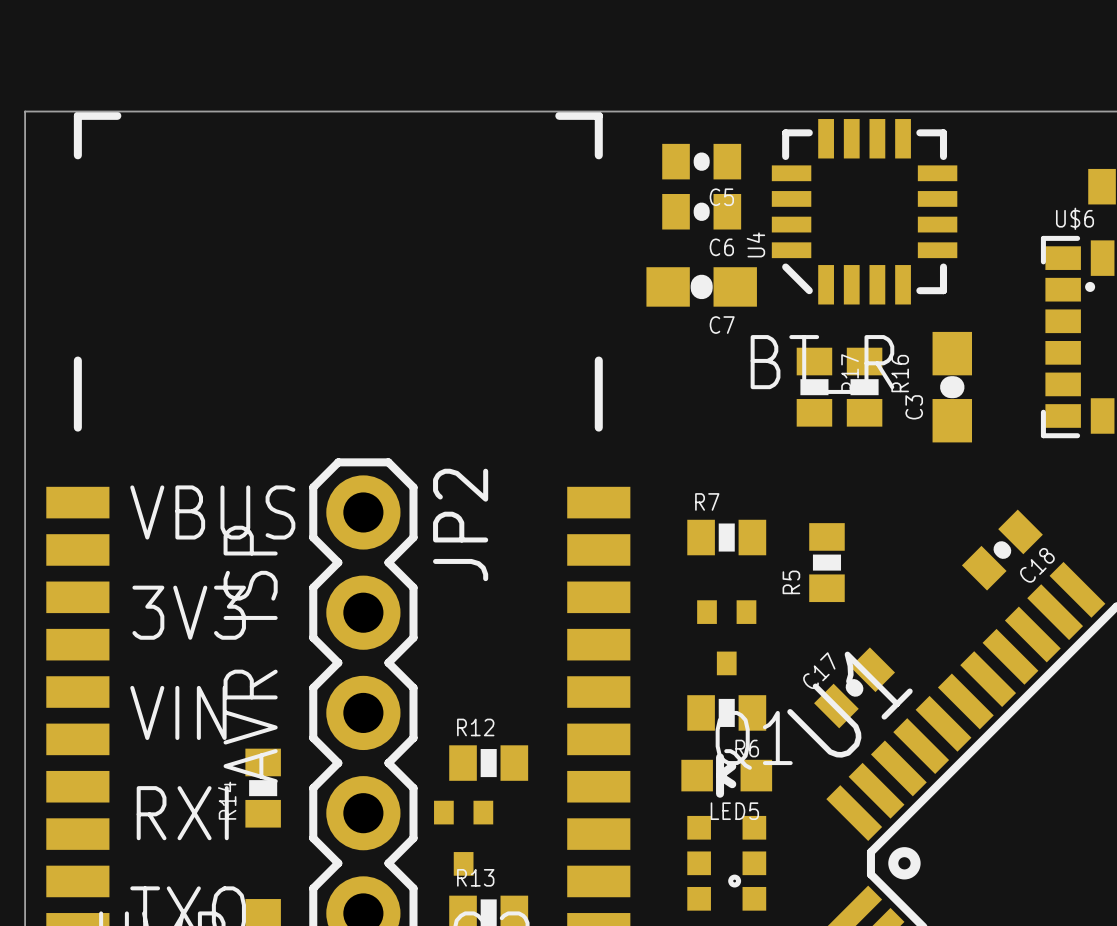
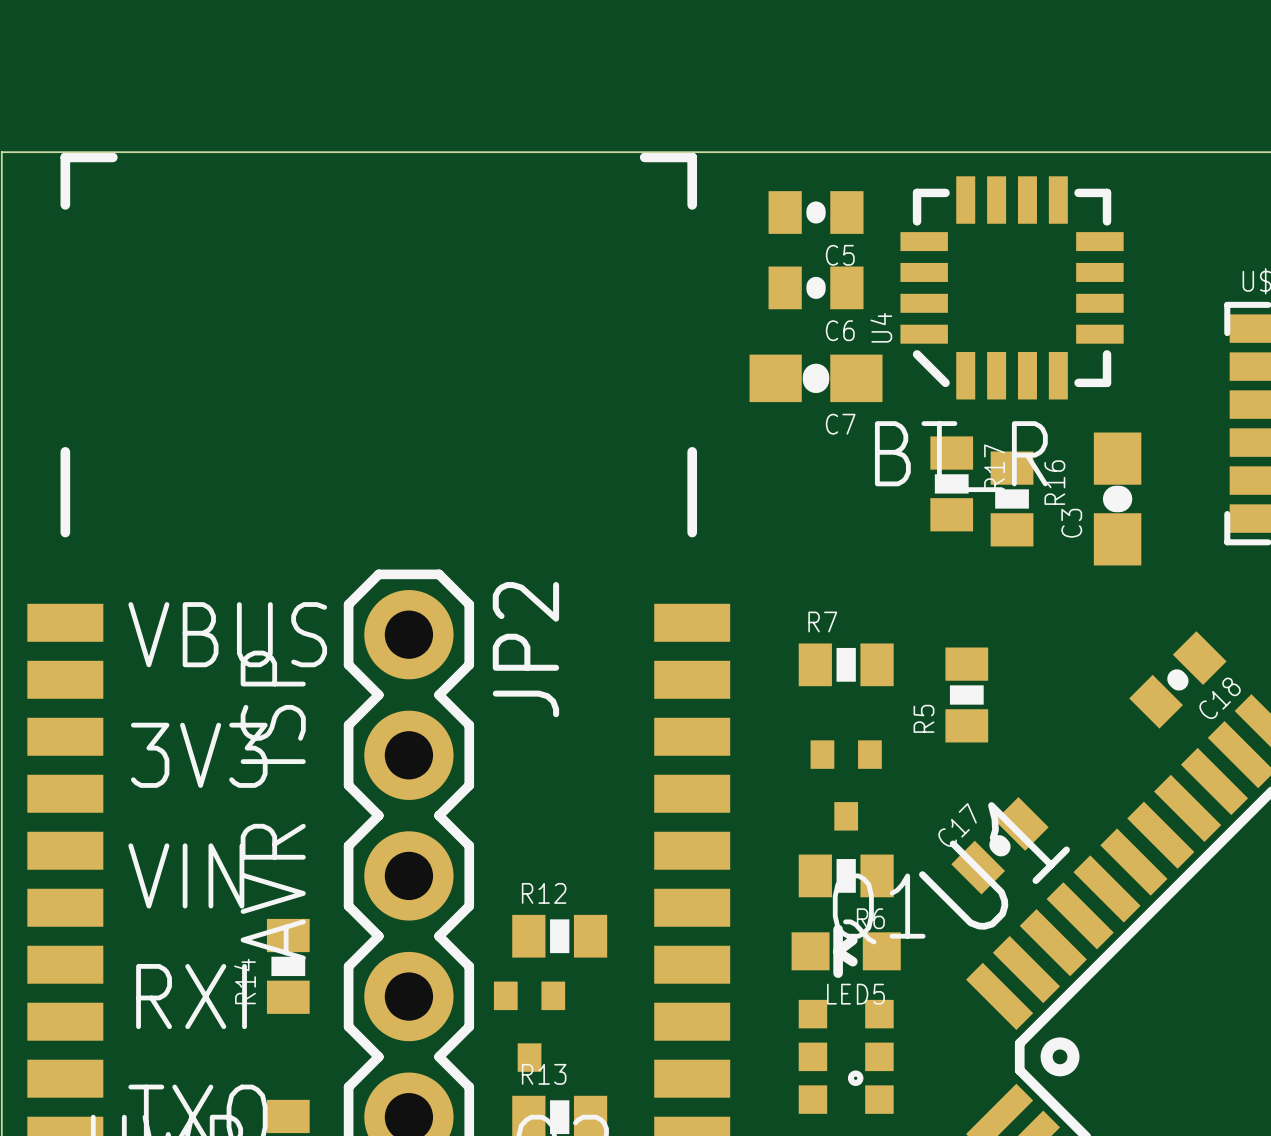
C6 position: (701, 211) -> (816, 287)
U4 position: (864, 211) -> (1012, 287)
C7 position: (701, 286) -> (816, 378)
R16 position: (864, 387) -> (1012, 498)
C3 position: (952, 387) -> (1117, 498)

